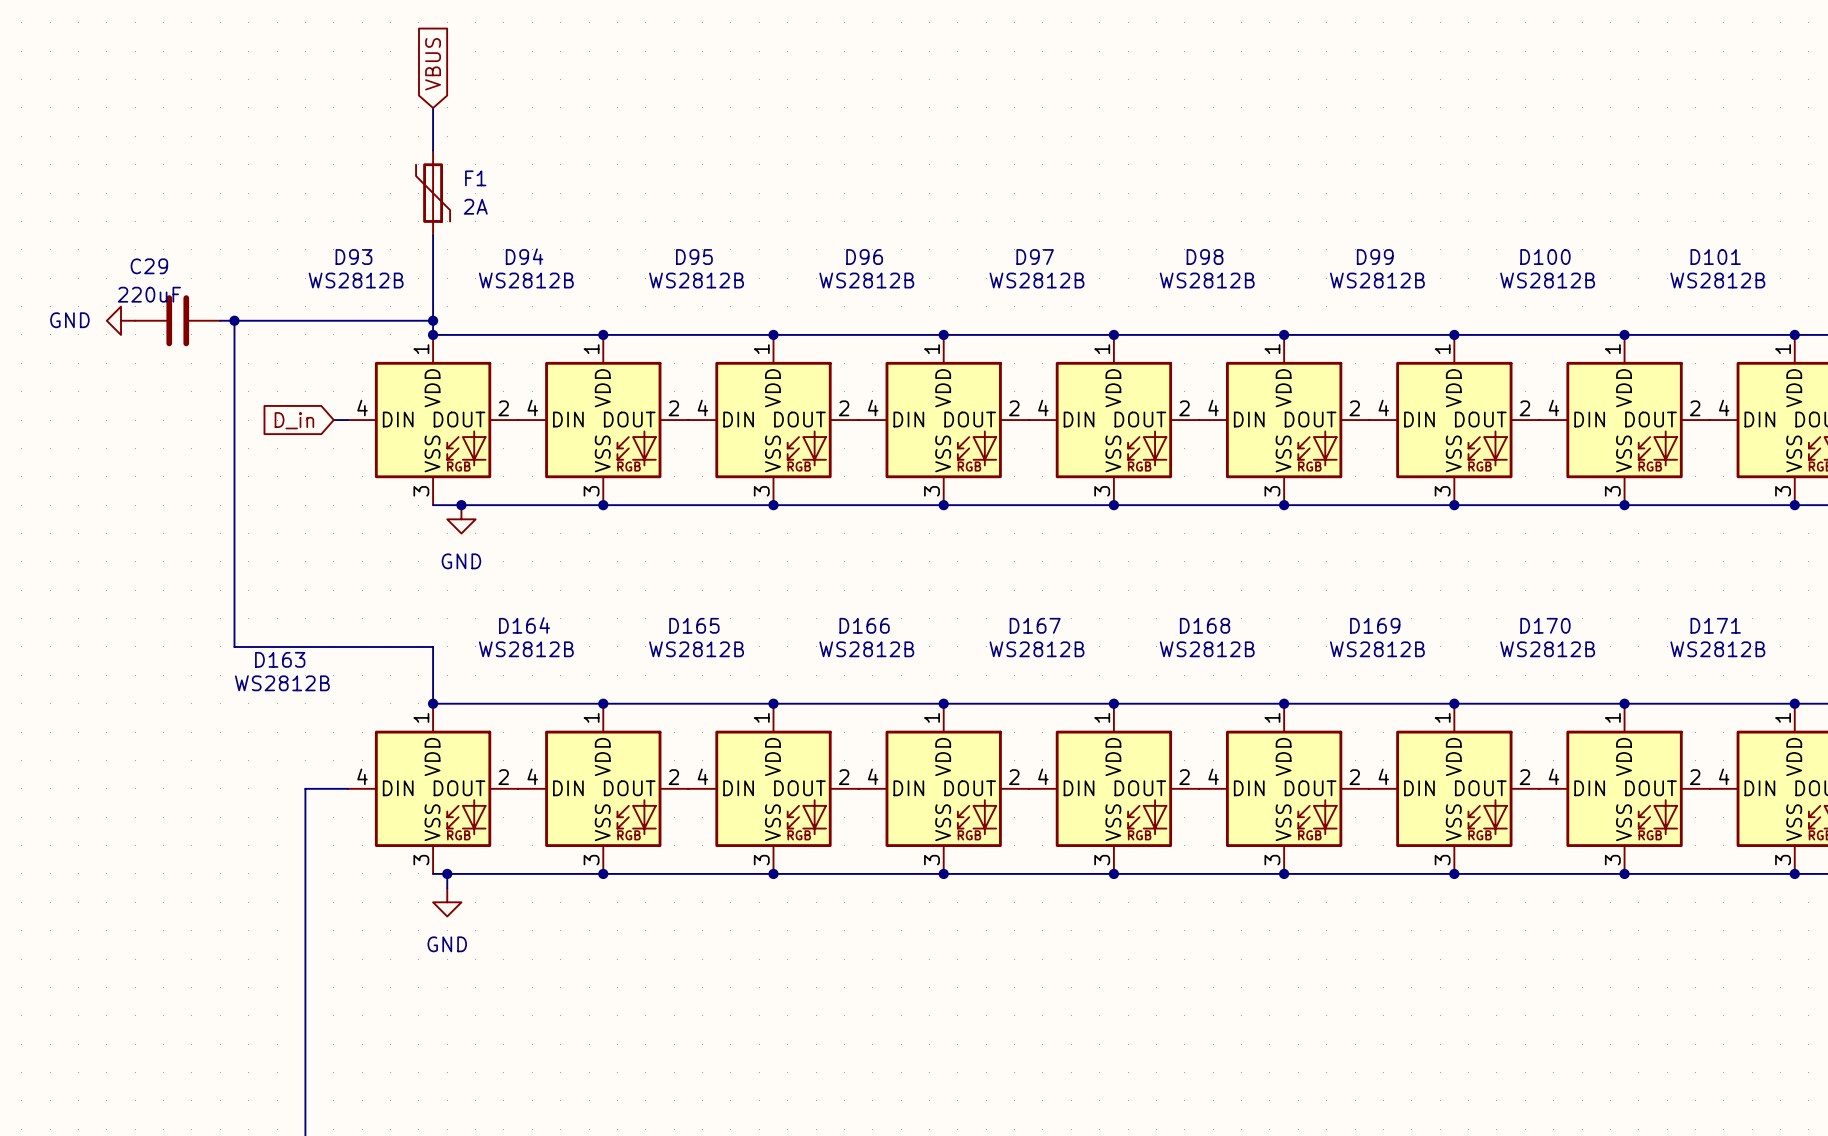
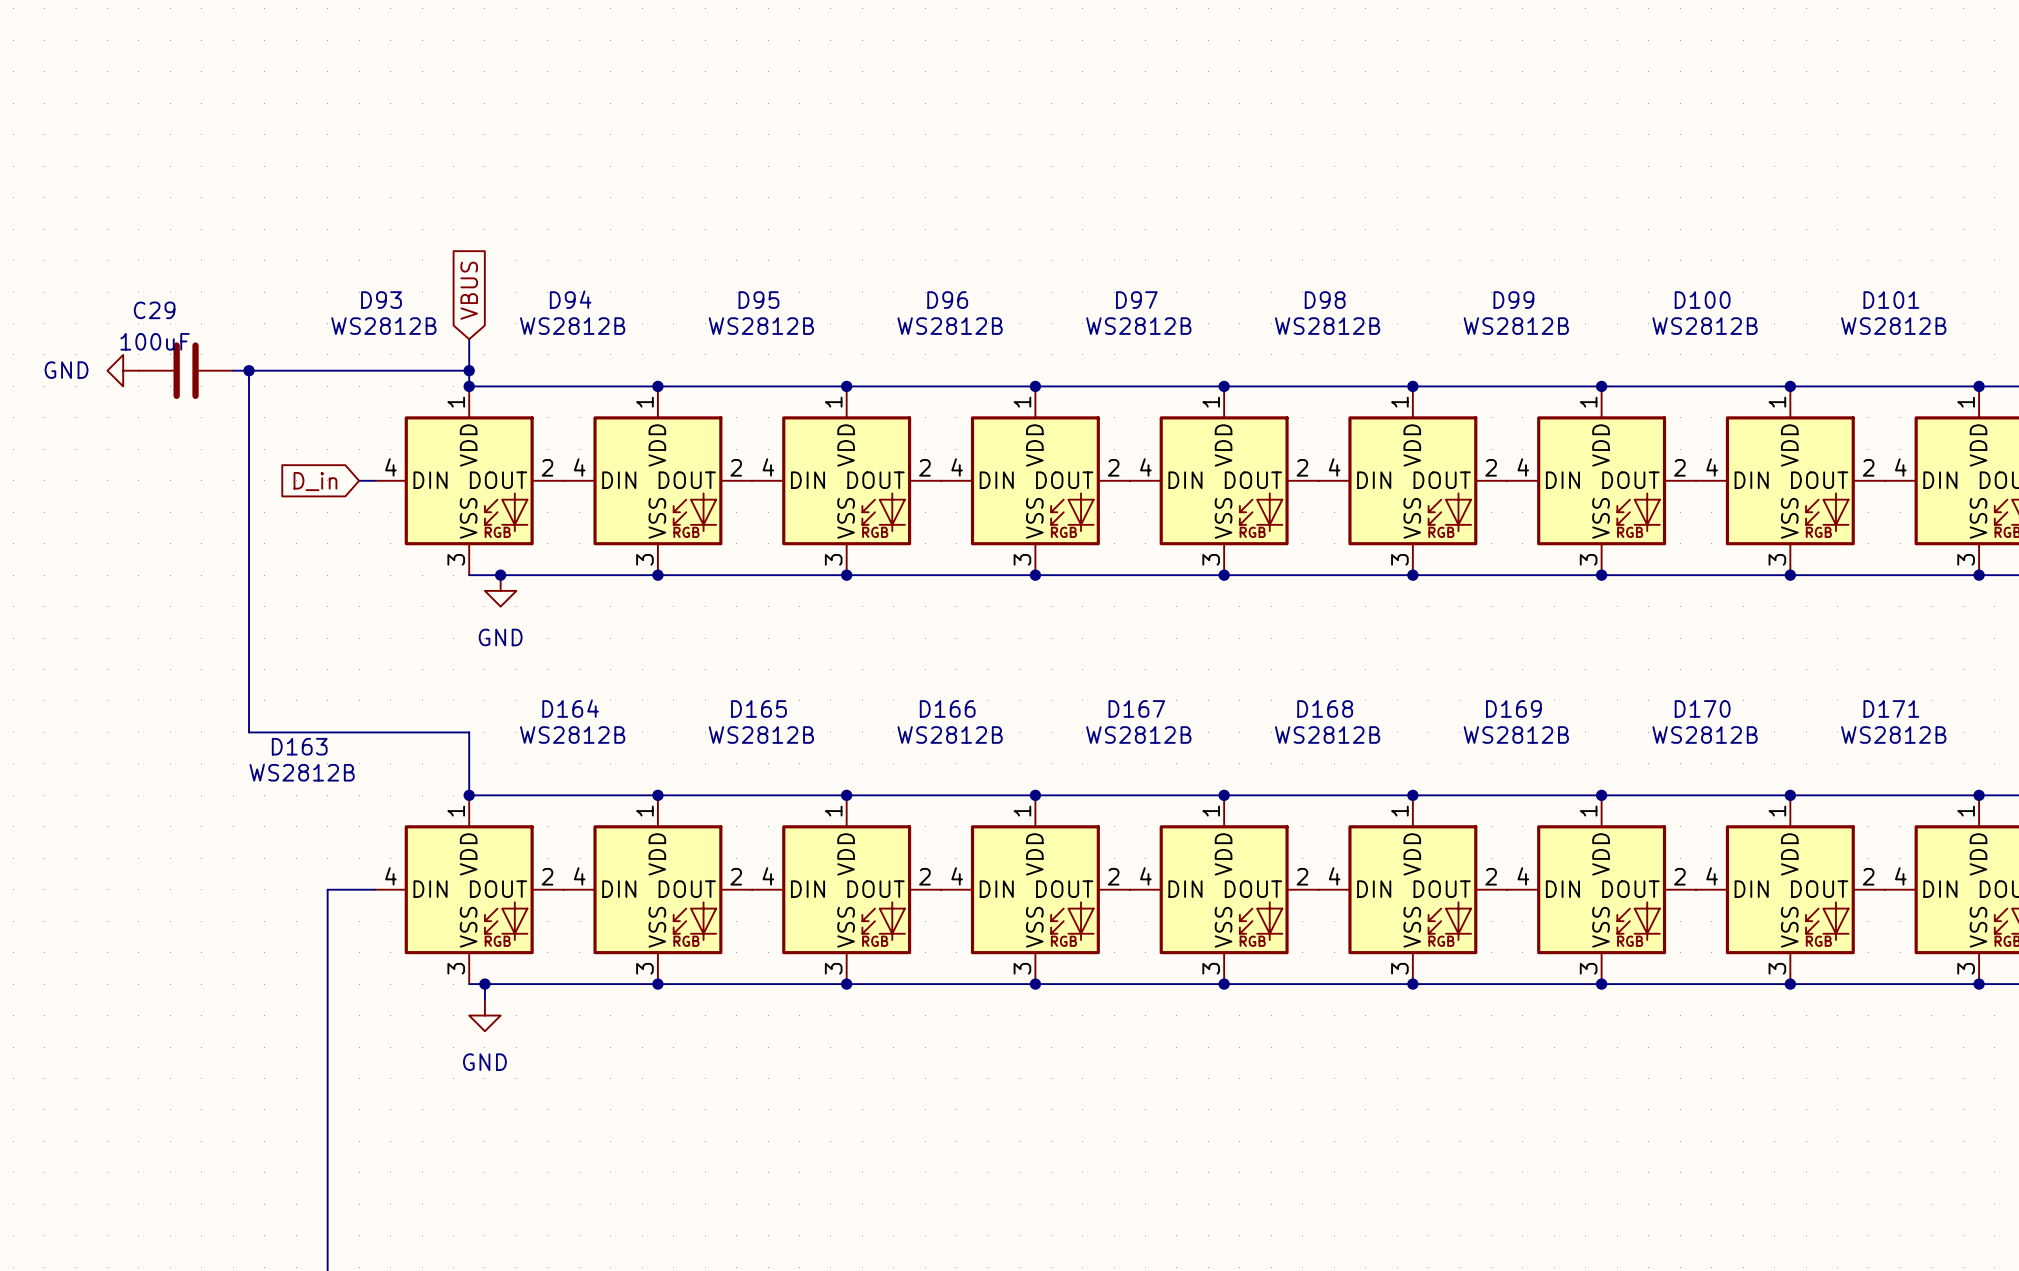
global label position: VBUS (433, 64) -> VBUS (469, 290)
wire: (433, 107) (433, 150) -> none
F1: 2A (433, 193) -> none
wire: (433, 235) (433, 292) -> none
C29 value: 220uF (149, 294) -> 100uF (155, 341)

